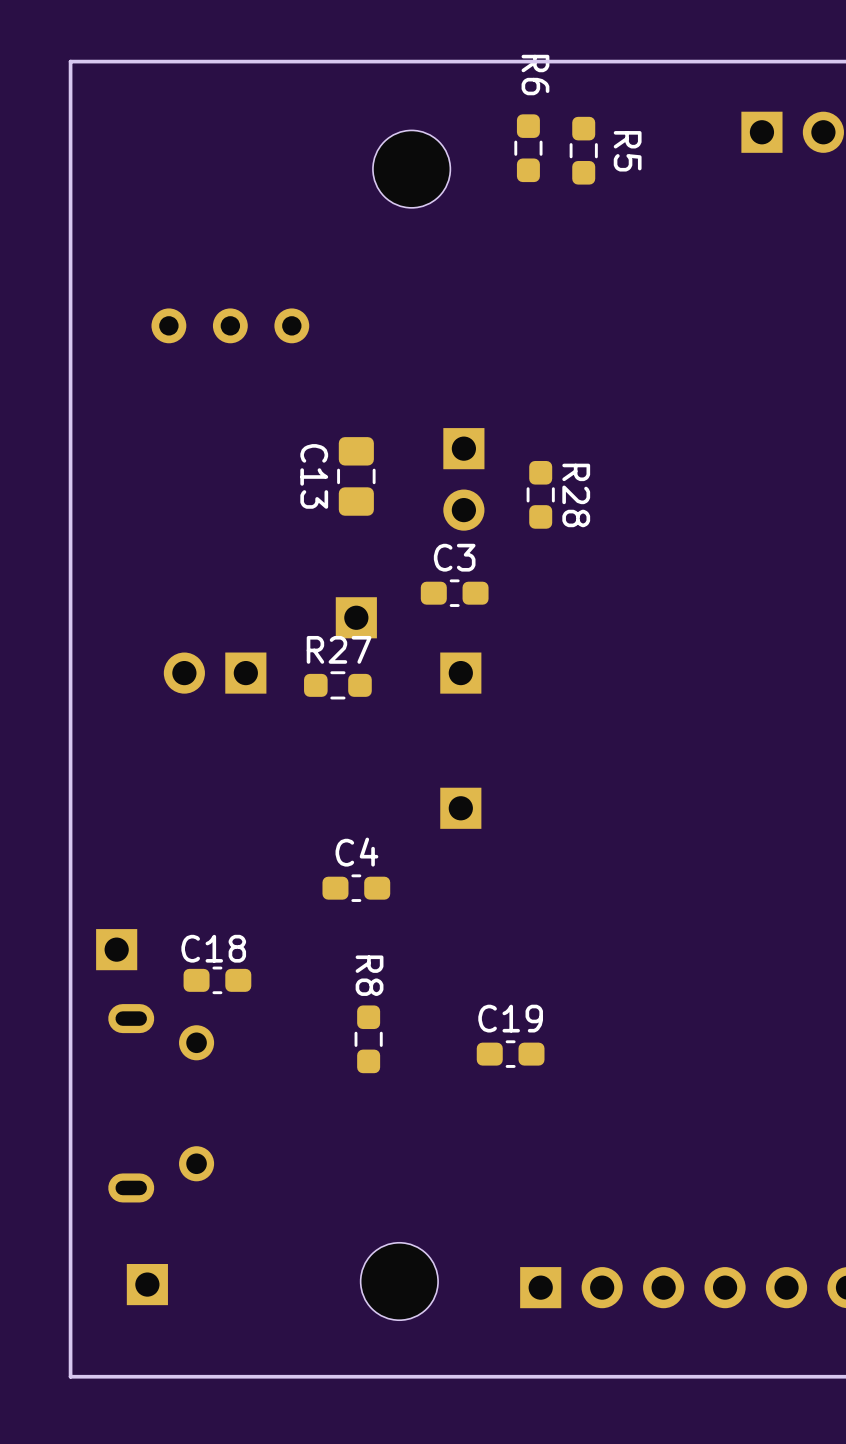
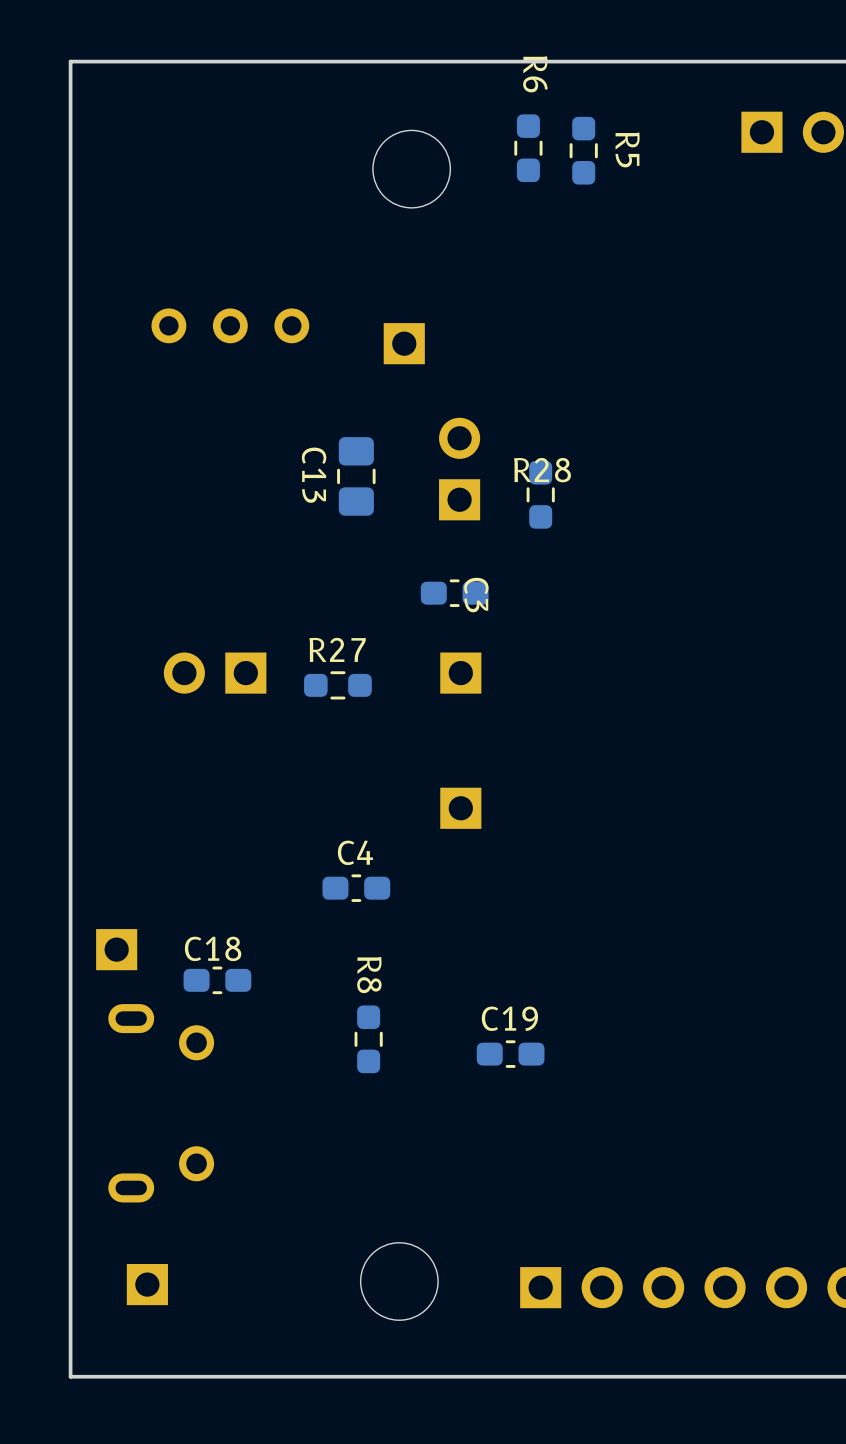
part rotation: 0° (463, 479) -> 180° (459, 469)
R28 name rotation: 0° (576, 495) -> 90° counterclockwise (542, 470)
C3 name rotation: 0° (454, 557) -> 90° clockwise (476, 595)
part position: (356, 617) -> (404, 343)

